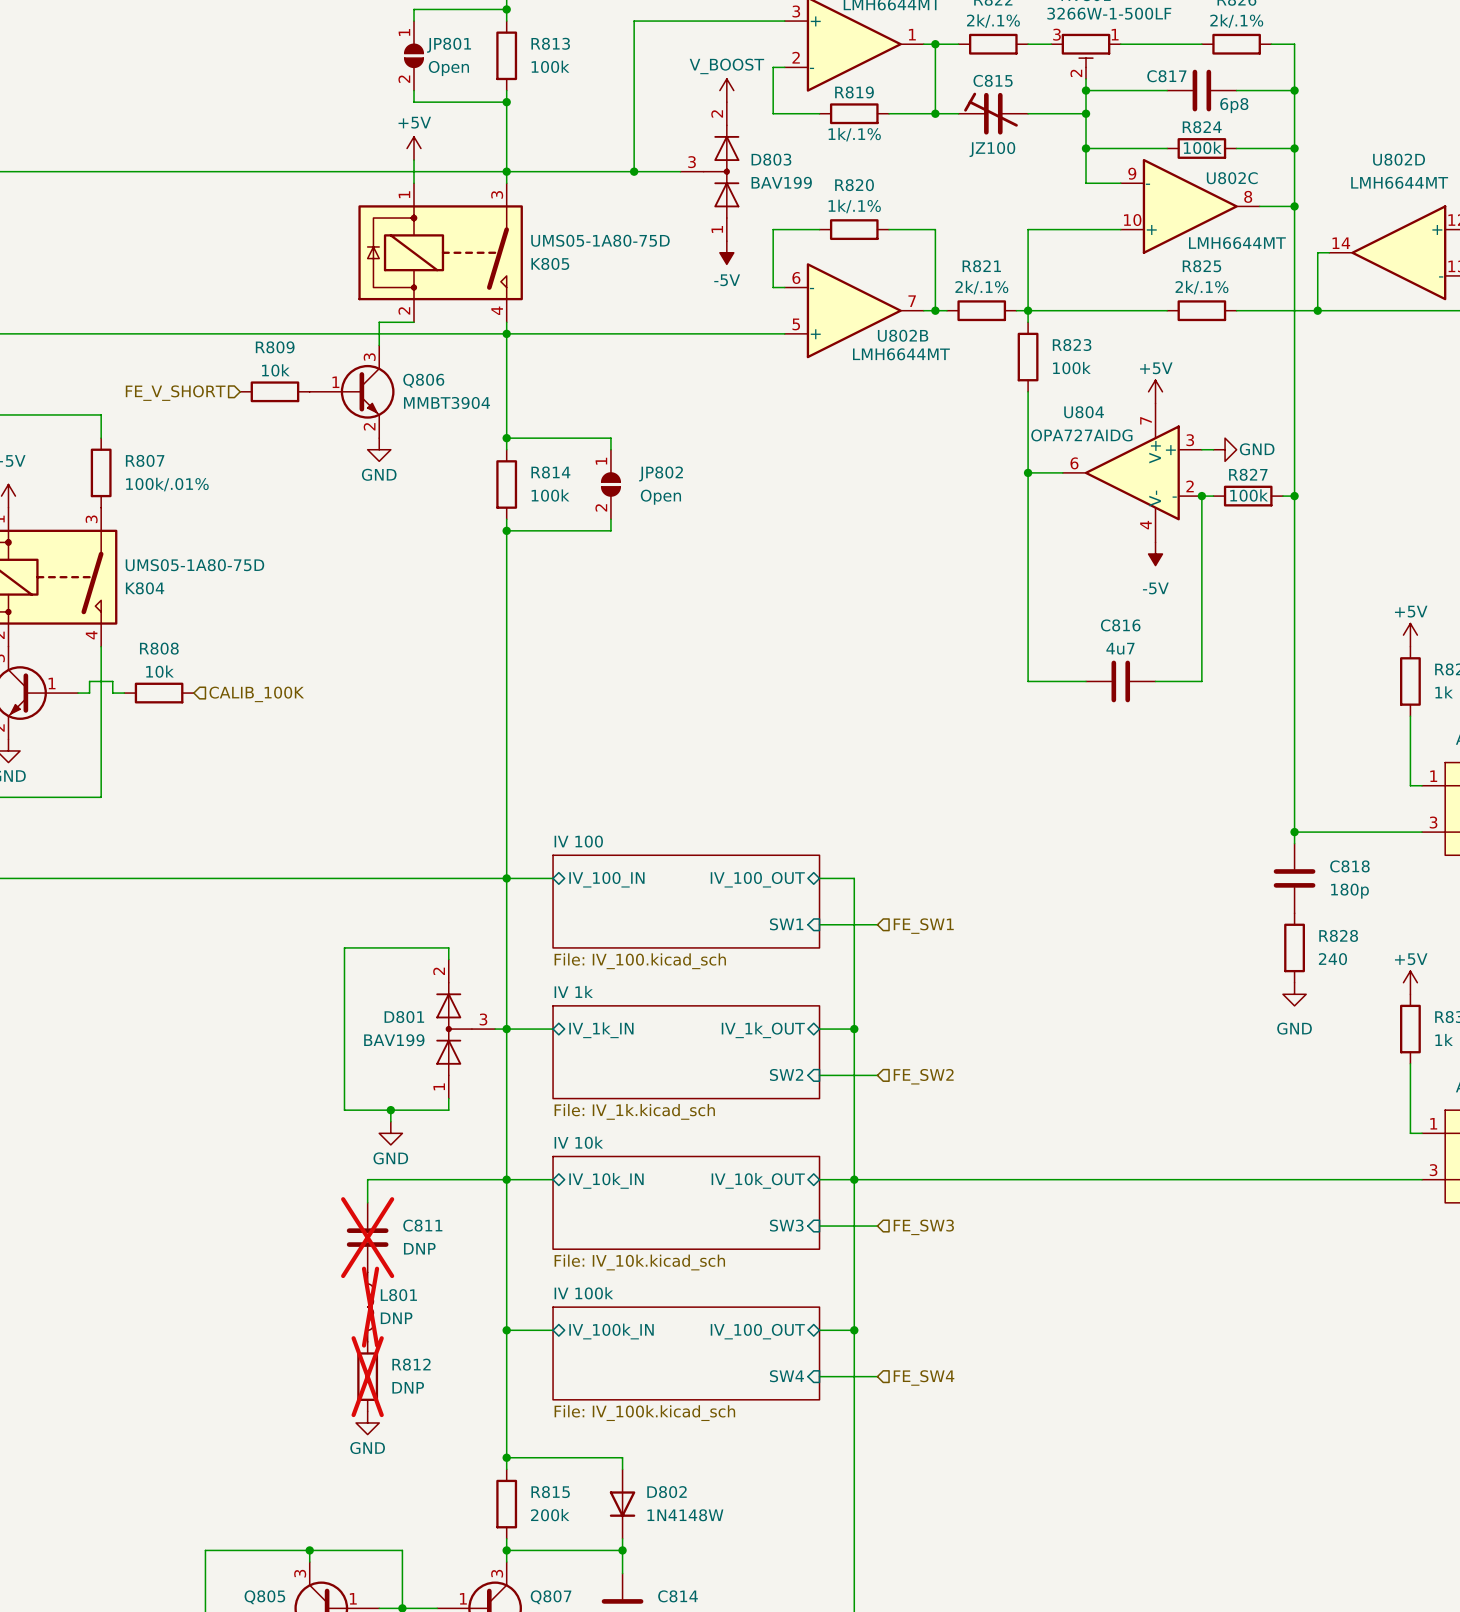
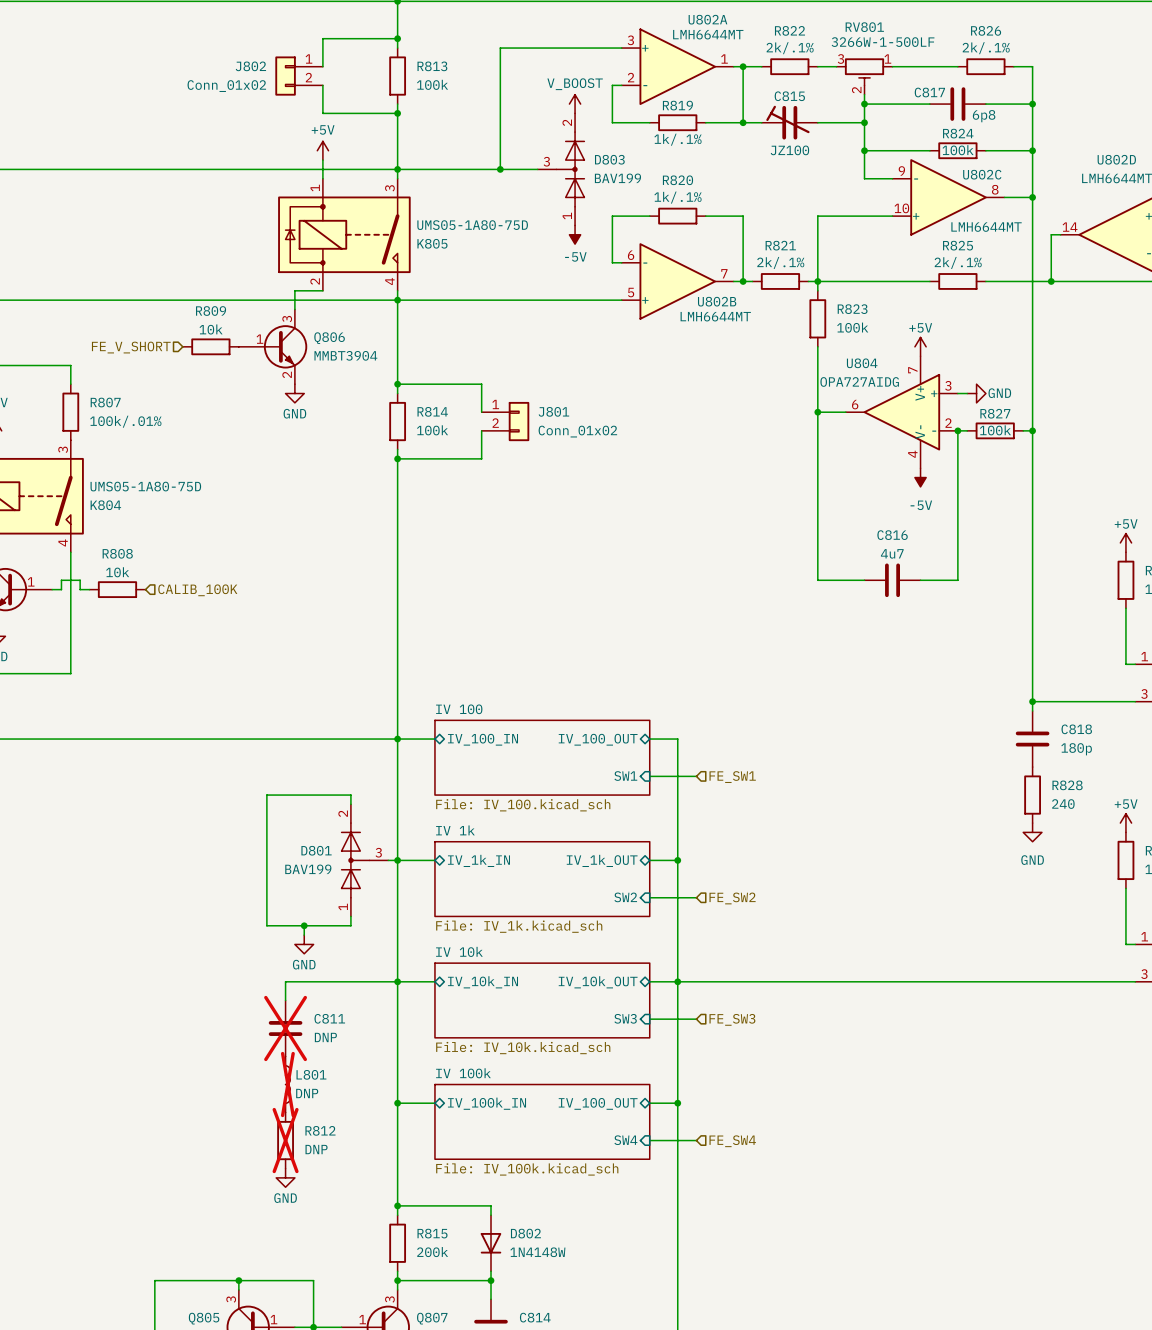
J802: none -> Conn_01x02 (299, 76)
JP801: Open (414, 55) -> none
JP802: Open (610, 484) -> none
J801: none -> Conn_01x02 (505, 421)

